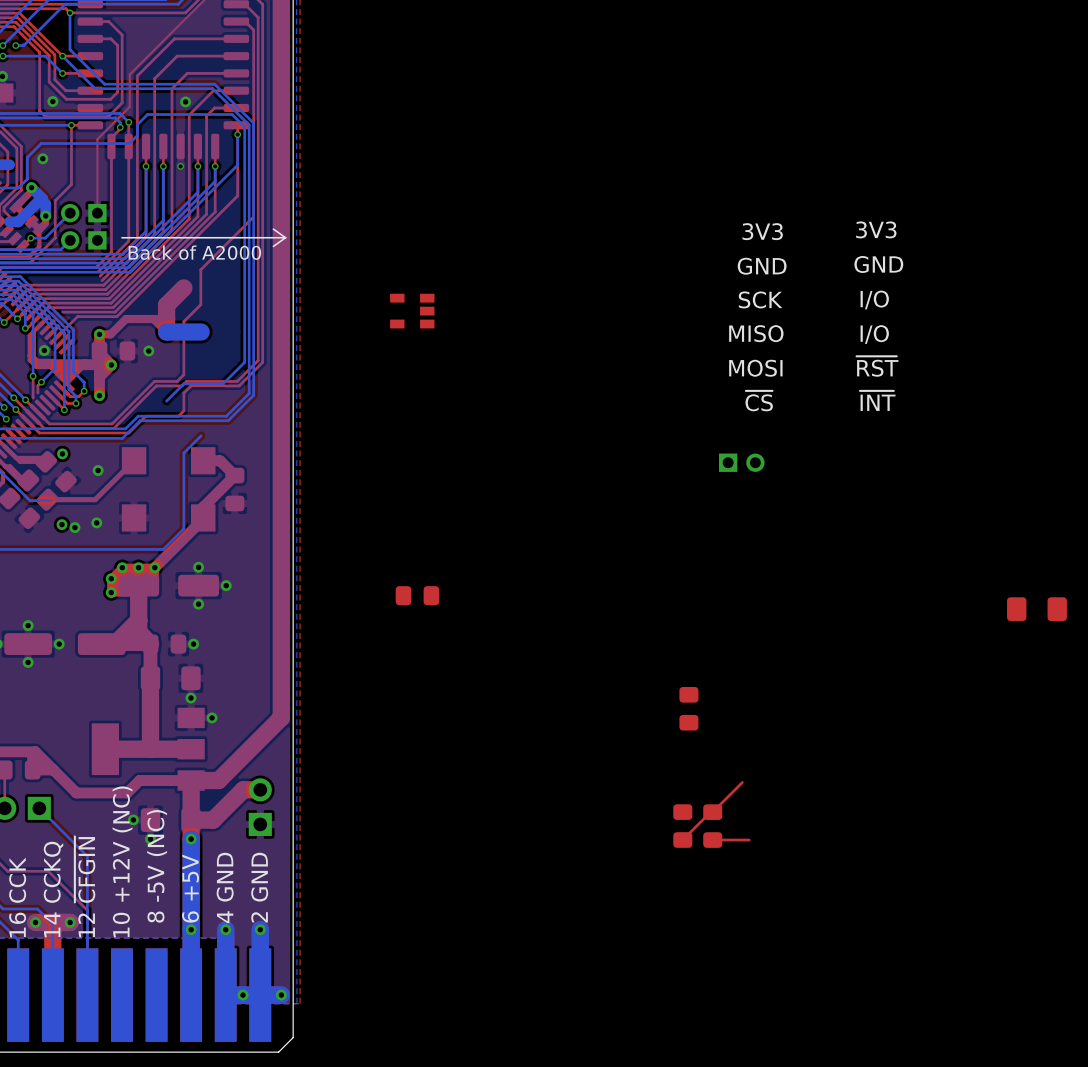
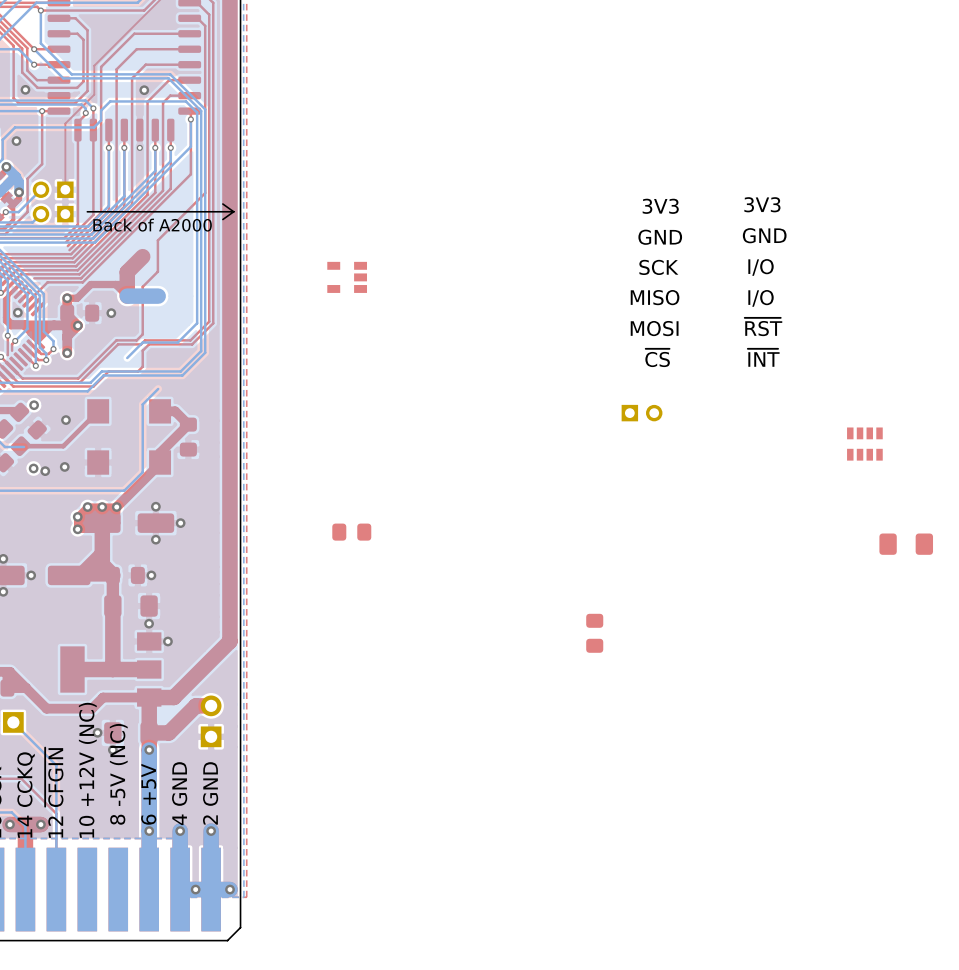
part: none -> (864, 444)
top track: (742, 782) (712, 812) -> none
top track: (710, 812) (682, 840) -> none
part: (682, 826) -> none
part: (712, 826) -> none
top track: (749, 840) (712, 840) -> none

